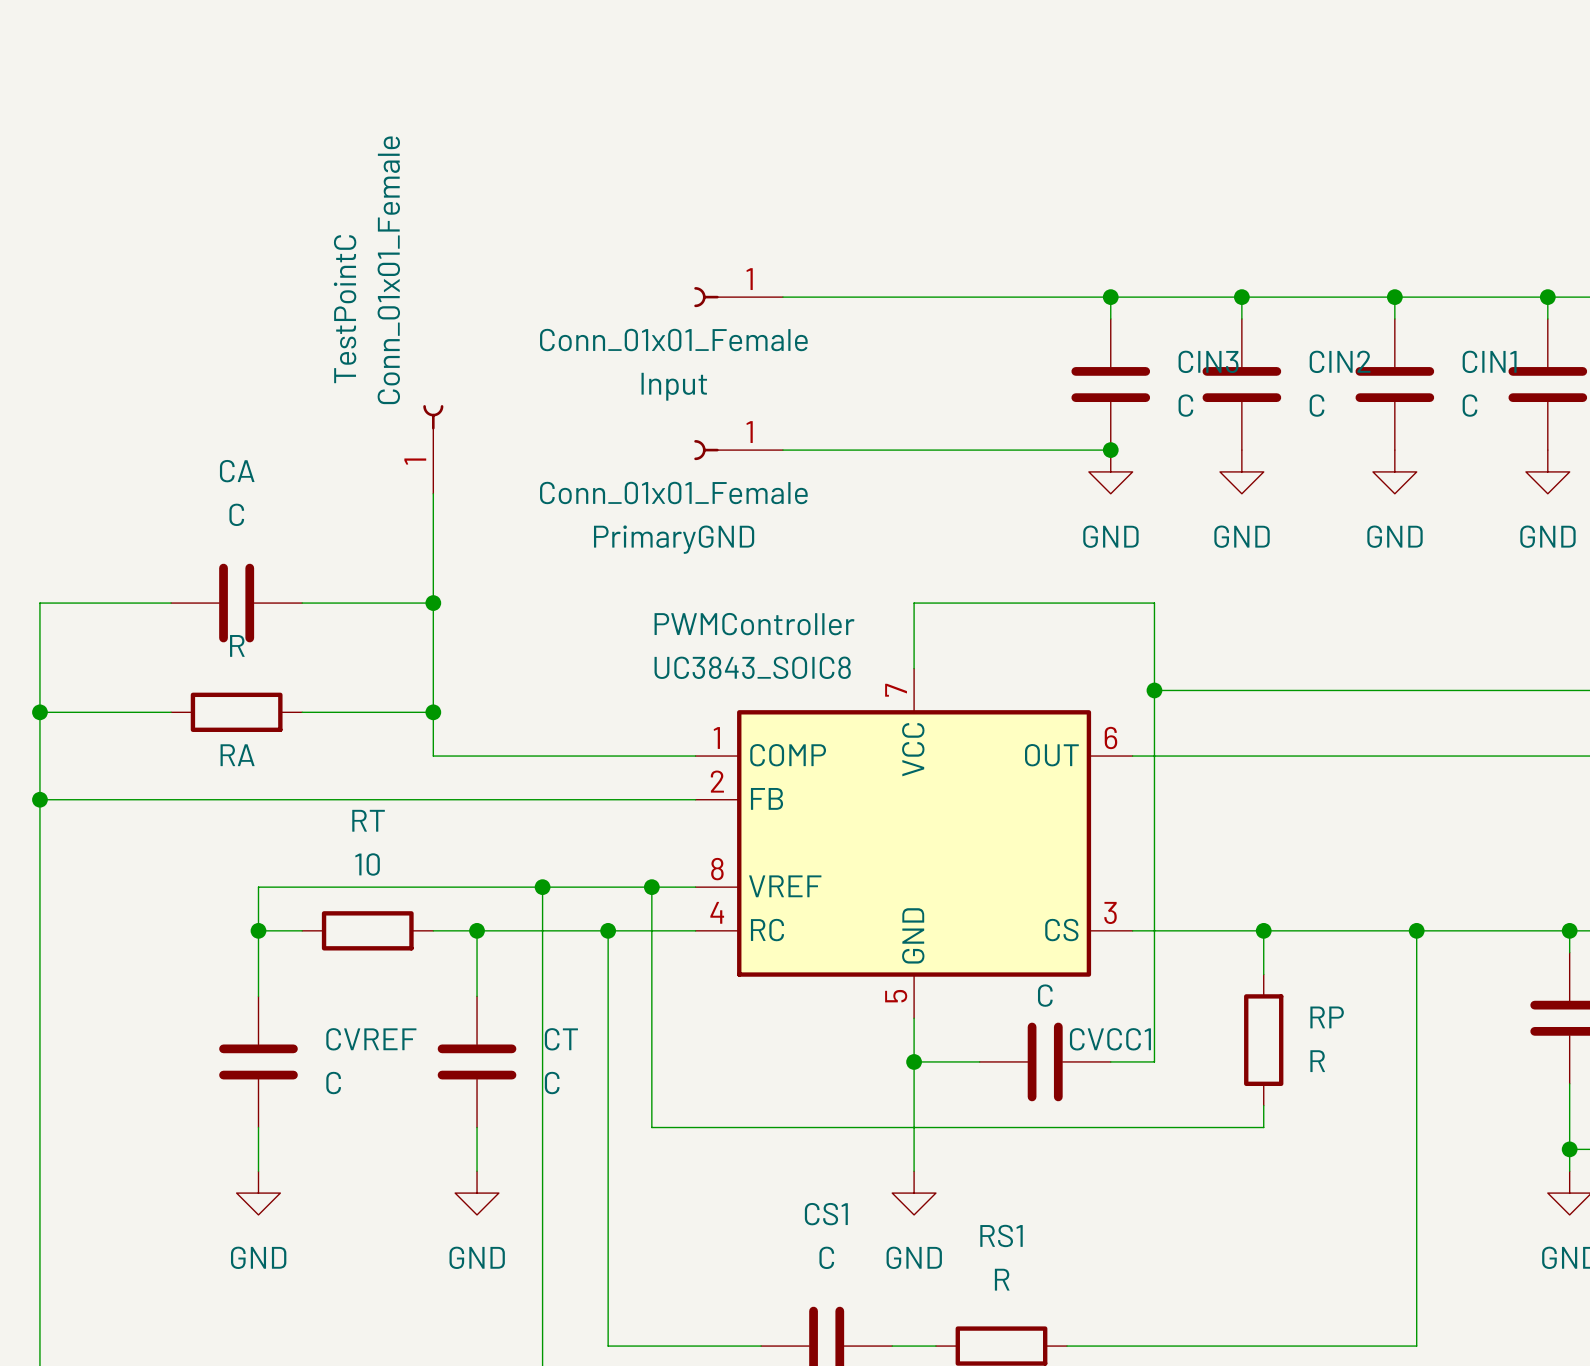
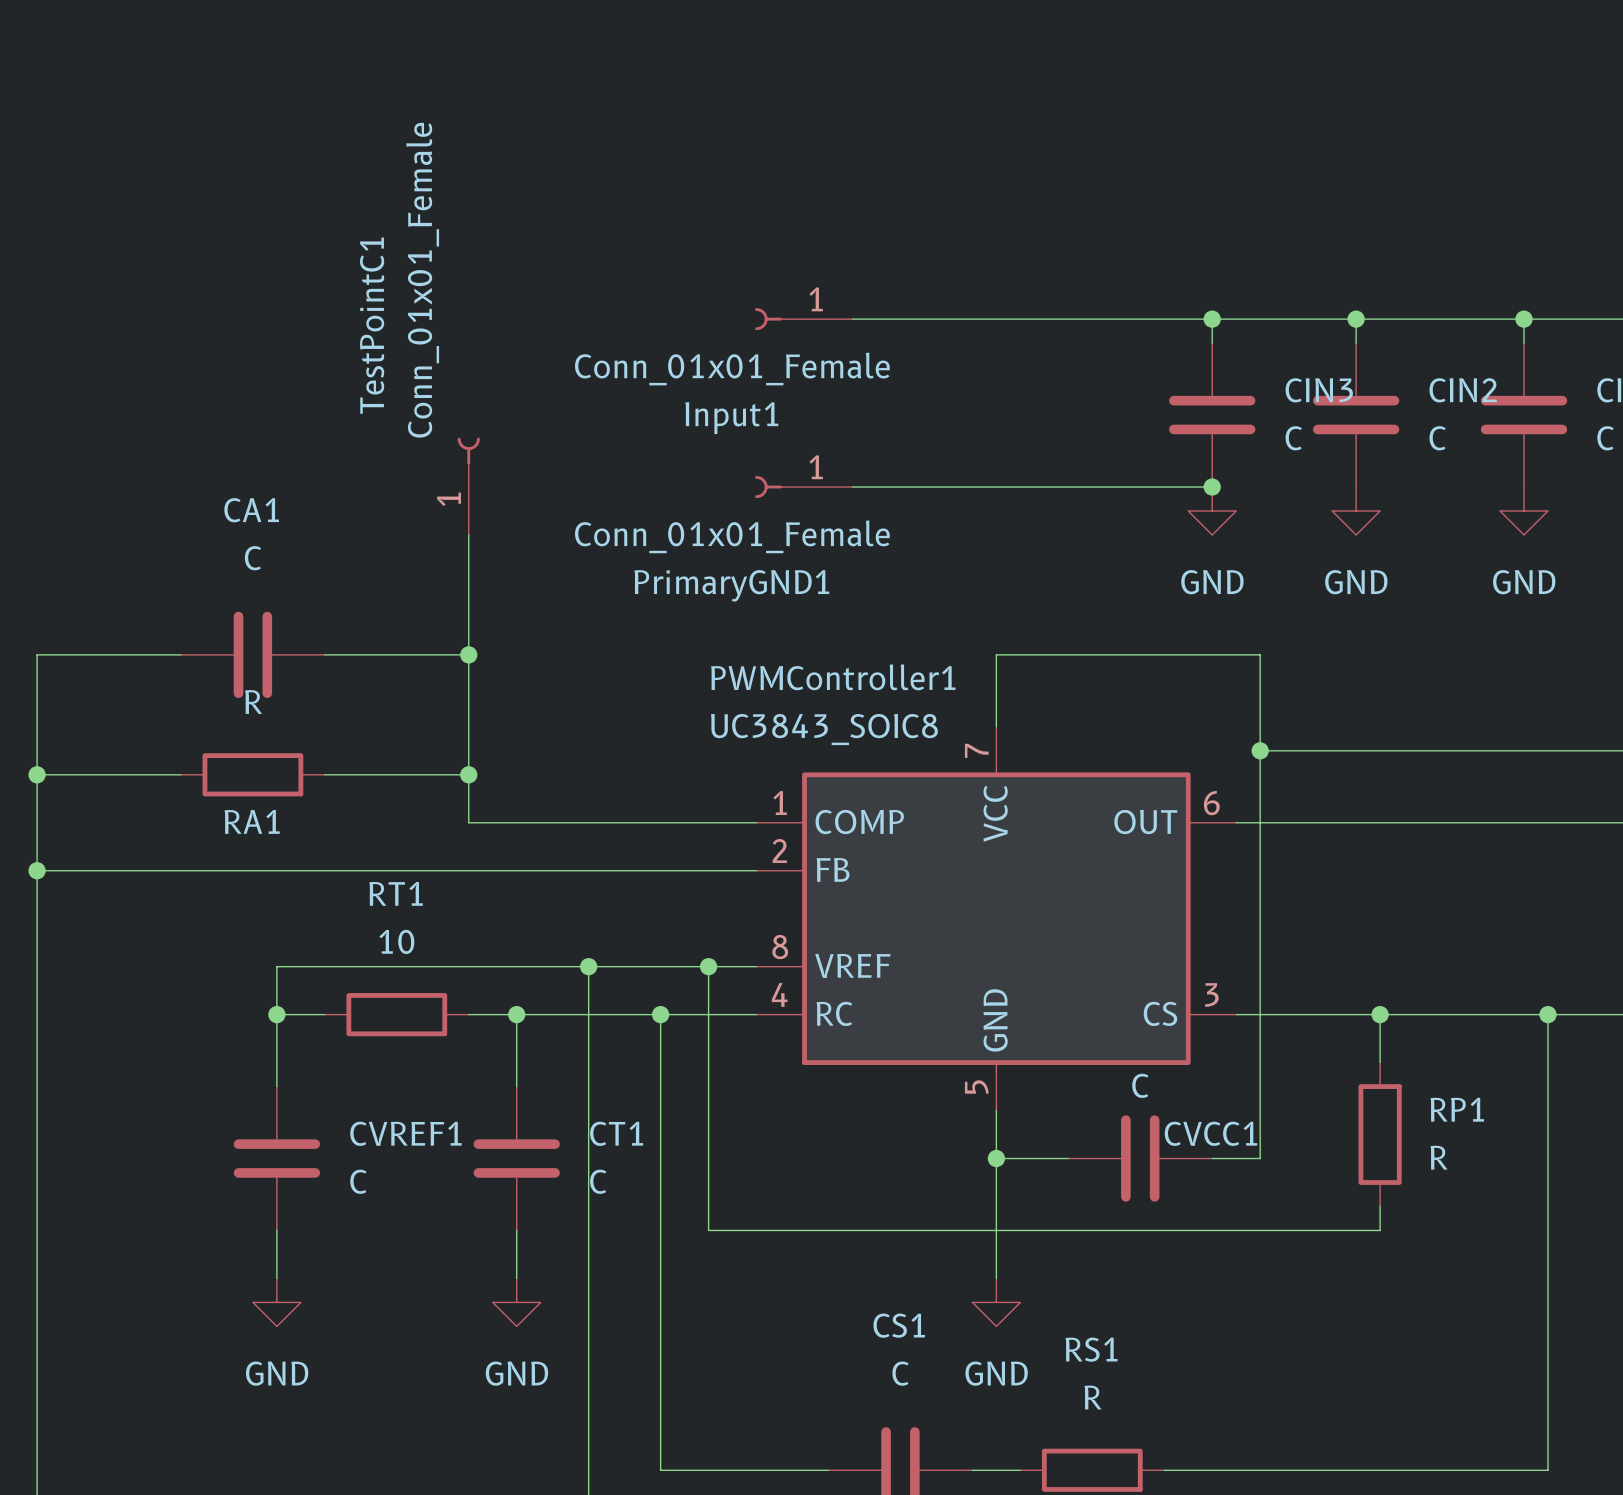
TestPointC name: TestPointC (345, 309) -> TestPointC1 (372, 325)
Input name: Input (674, 386) -> Input1 (731, 418)
CA name: CA (237, 471) -> CA1 (251, 510)
PrimaryGND name: PrimaryGND (674, 539) -> PrimaryGND1 (731, 585)
PWMController name: PWMController (754, 624) -> PWMController1 (833, 677)
RA name: RA (237, 755) -> RA1 (252, 821)
RT name: RT (368, 820) -> RT1 (396, 893)
RP name: RP (1327, 1017) -> RP1 (1457, 1109)
CVREF name: CVREF (371, 1039) -> CVREF1 (405, 1133)
CT name: CT (561, 1039) -> CT1 (616, 1133)

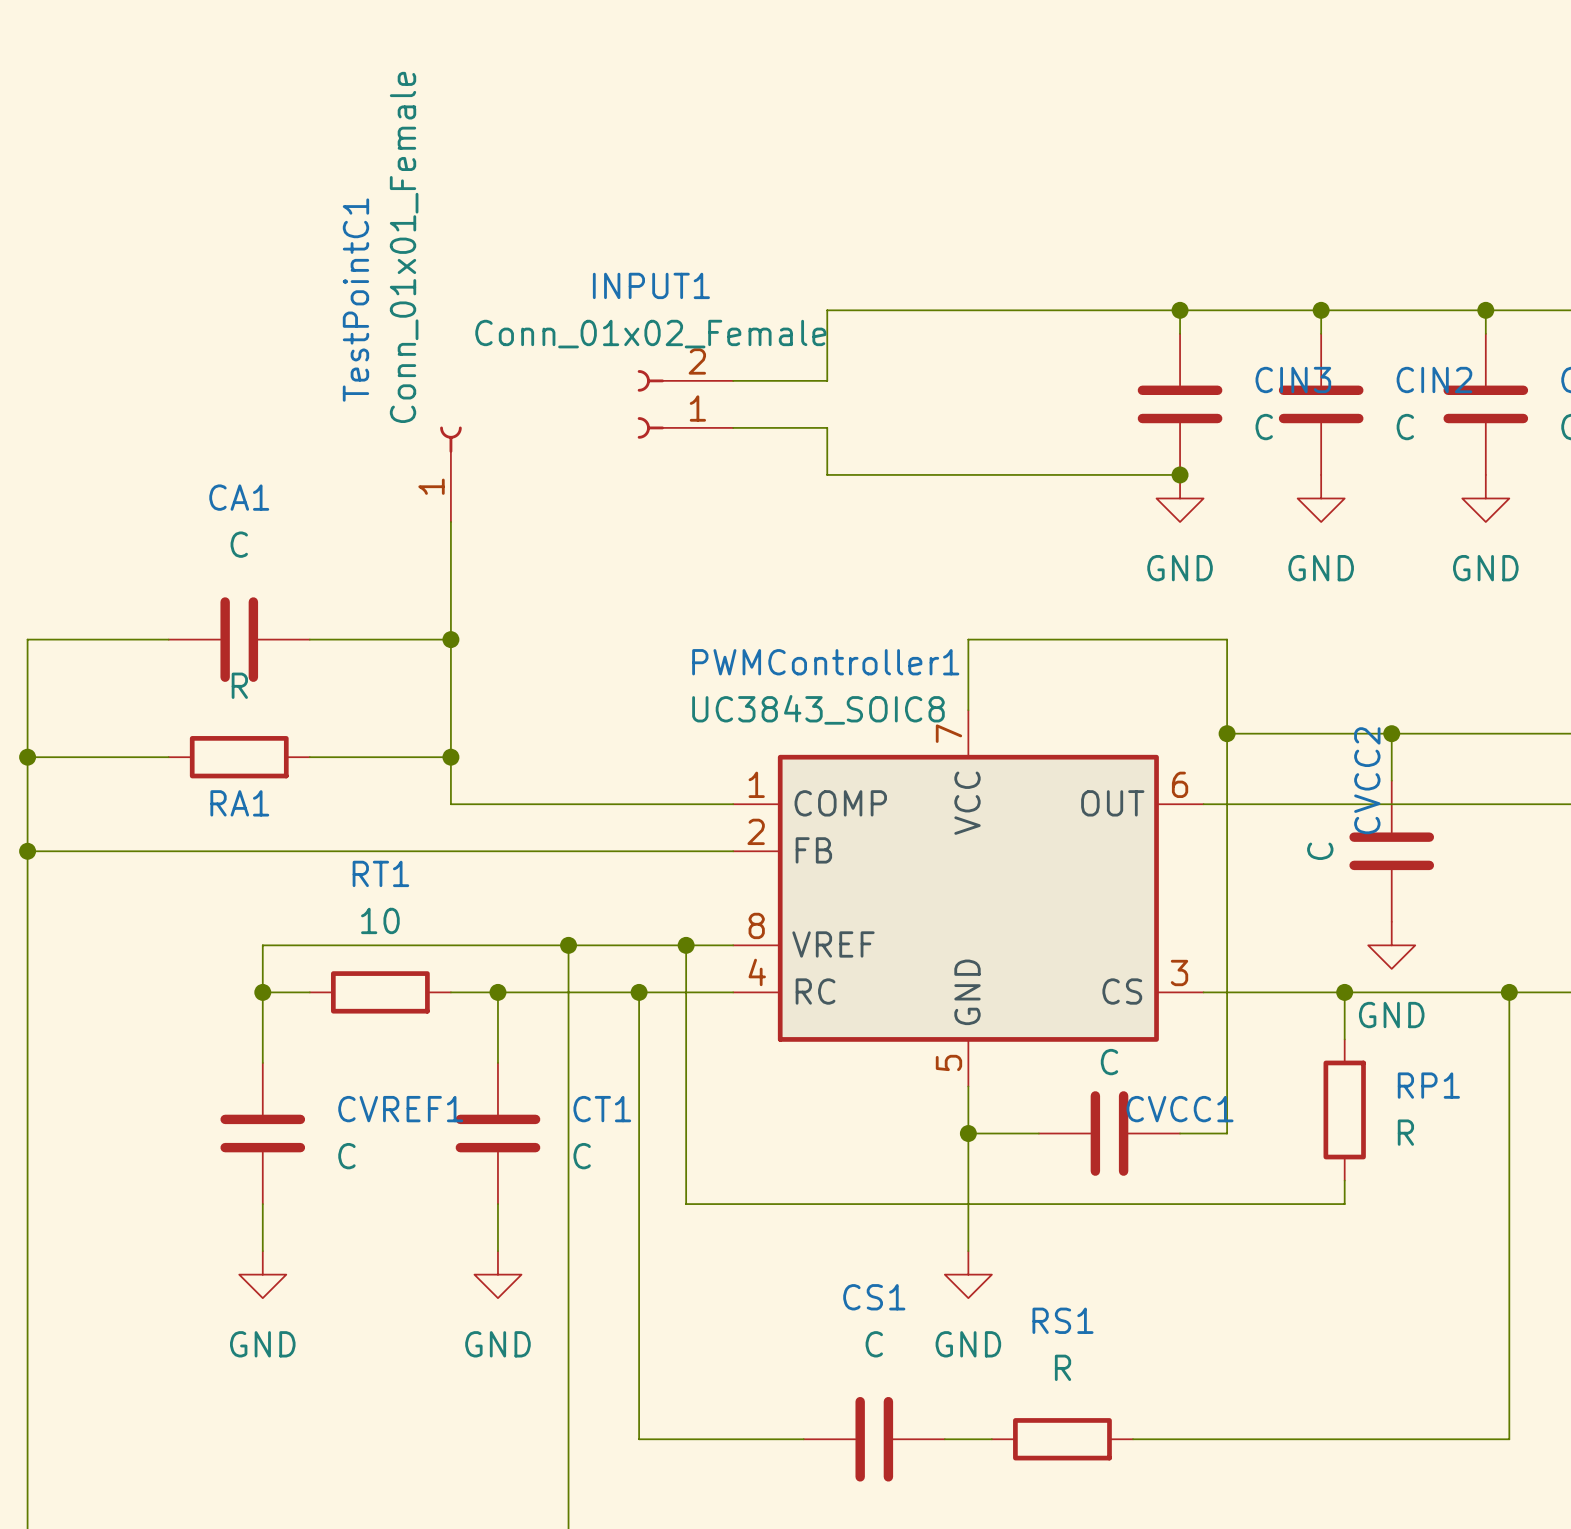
Input1: Conn_01x01_Female (803, 319) -> none
wire: none -> (827, 310) (827, 380) (733, 380)
INPUT1: none -> Conn_01x02_Female (685, 404)
wire: none -> (733, 427) (827, 427) (827, 474)
PrimaryGND1: Conn_01x01_Female (803, 487) -> none
wire: none -> (1391, 733) (1391, 780)
junction: none -> (1391, 733)
CVCC2: none -> C (1391, 851)
power symbol: none -> GND (1391, 945)

